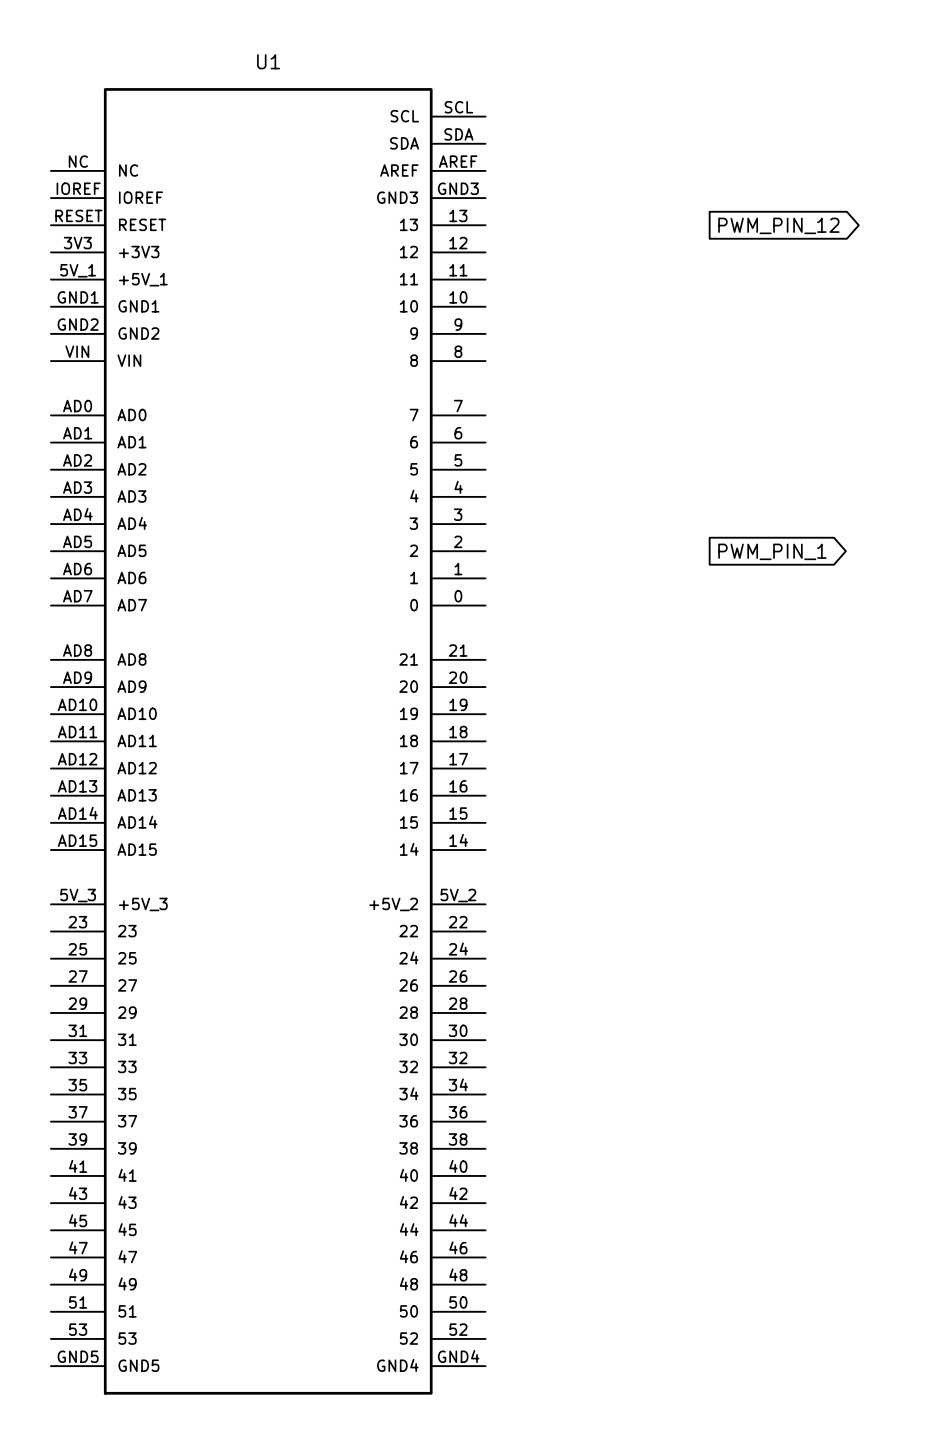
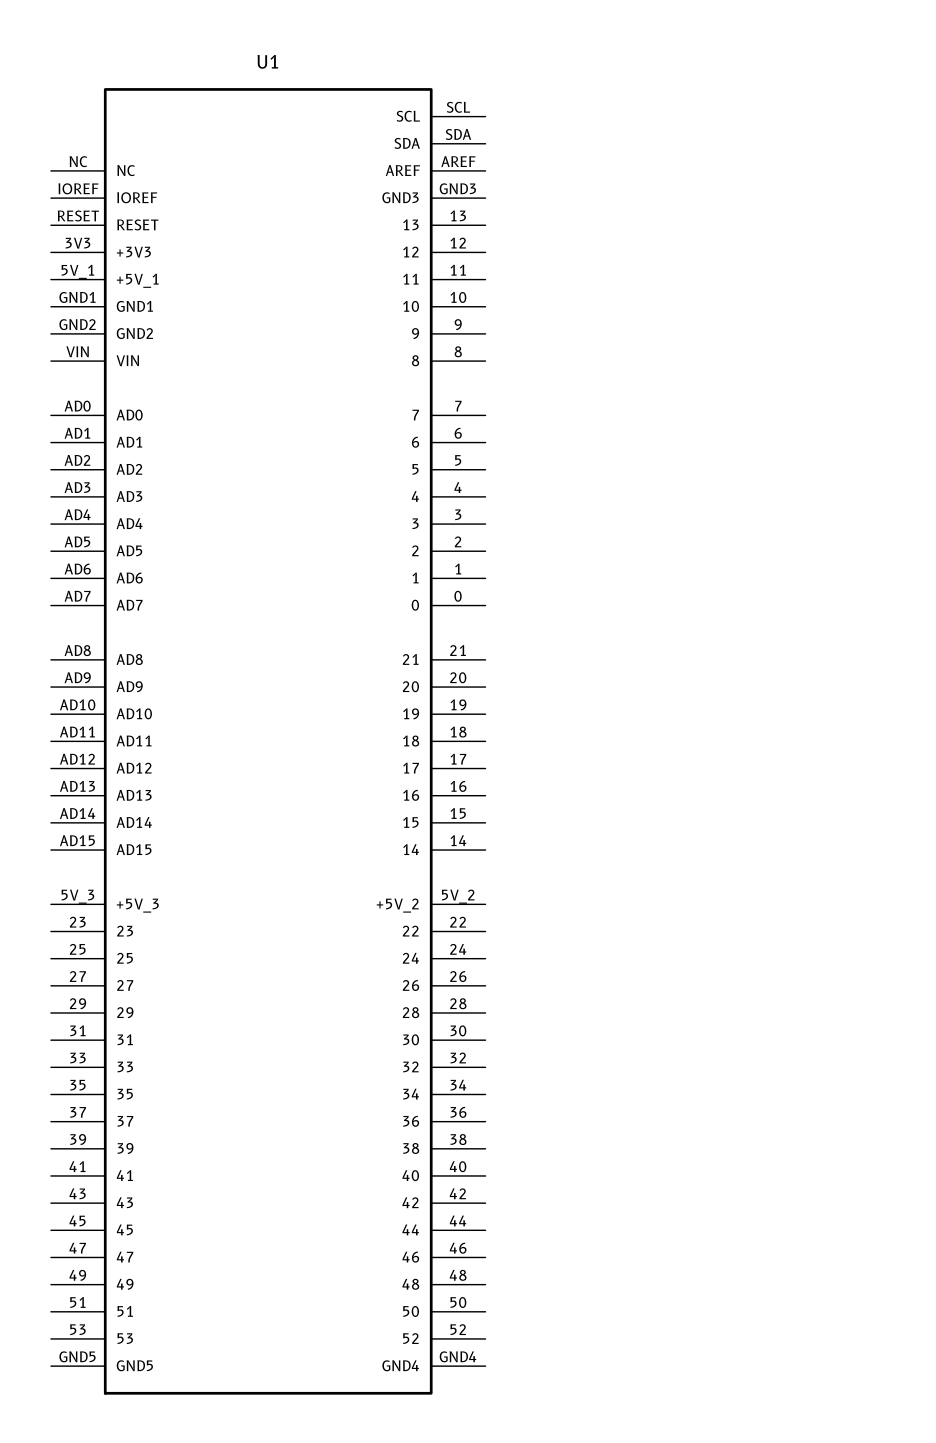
global label: PWM_PIN_12 (778, 225) -> none
global label: PWM_PIN_1 (772, 551) -> none

